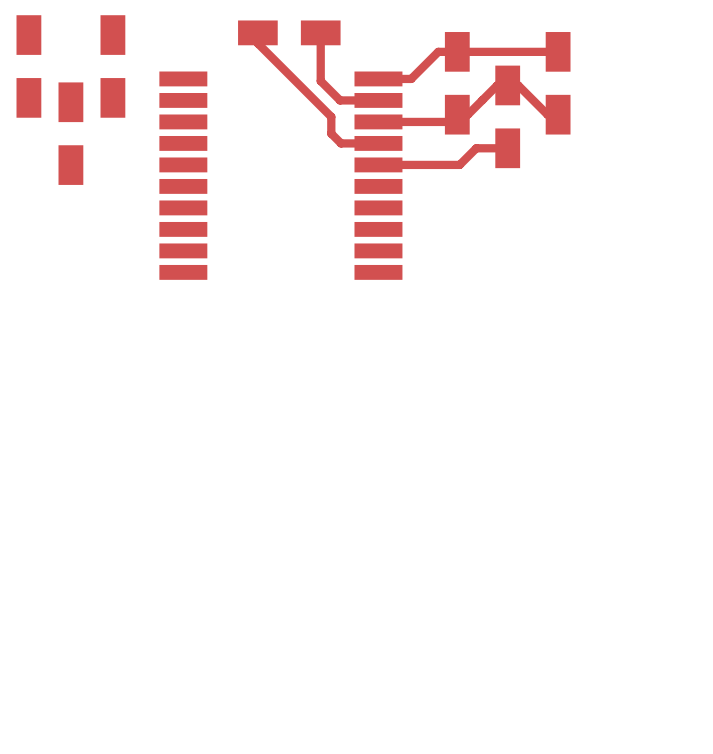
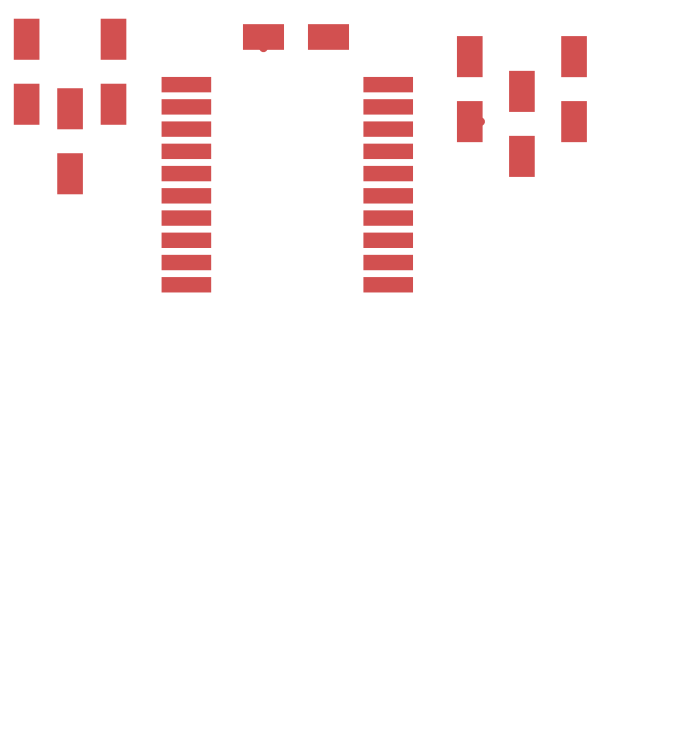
top track: (320, 32) (320, 81) (340, 100) (378, 100) -> none
top track: (257, 43) (331, 116) (331, 133) (341, 143) (378, 143) -> none
top track: (558, 51) (438, 51) (411, 78) (378, 78) -> none
top track: (558, 114) (547, 114) (518, 85) (497, 85) (467, 114) -> none
top track: (450, 121) (378, 121) -> none
top track: (507, 148) (476, 148) (459, 164) (378, 164) -> none

